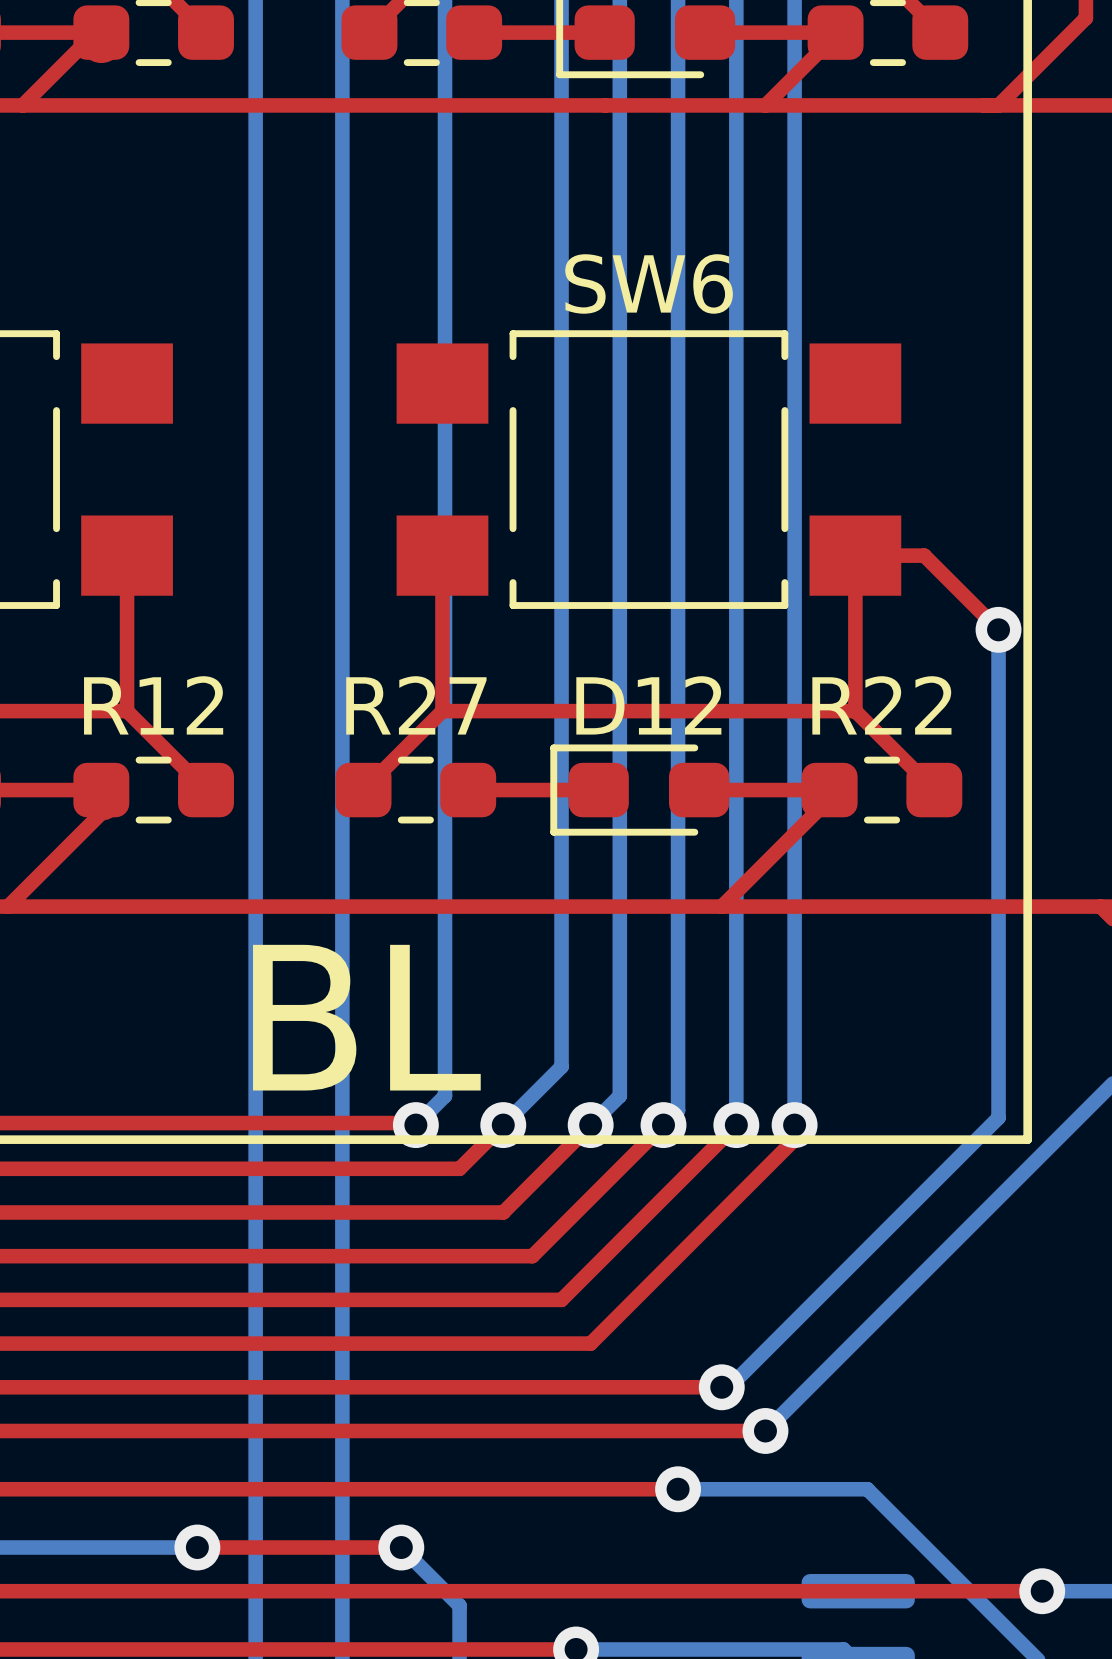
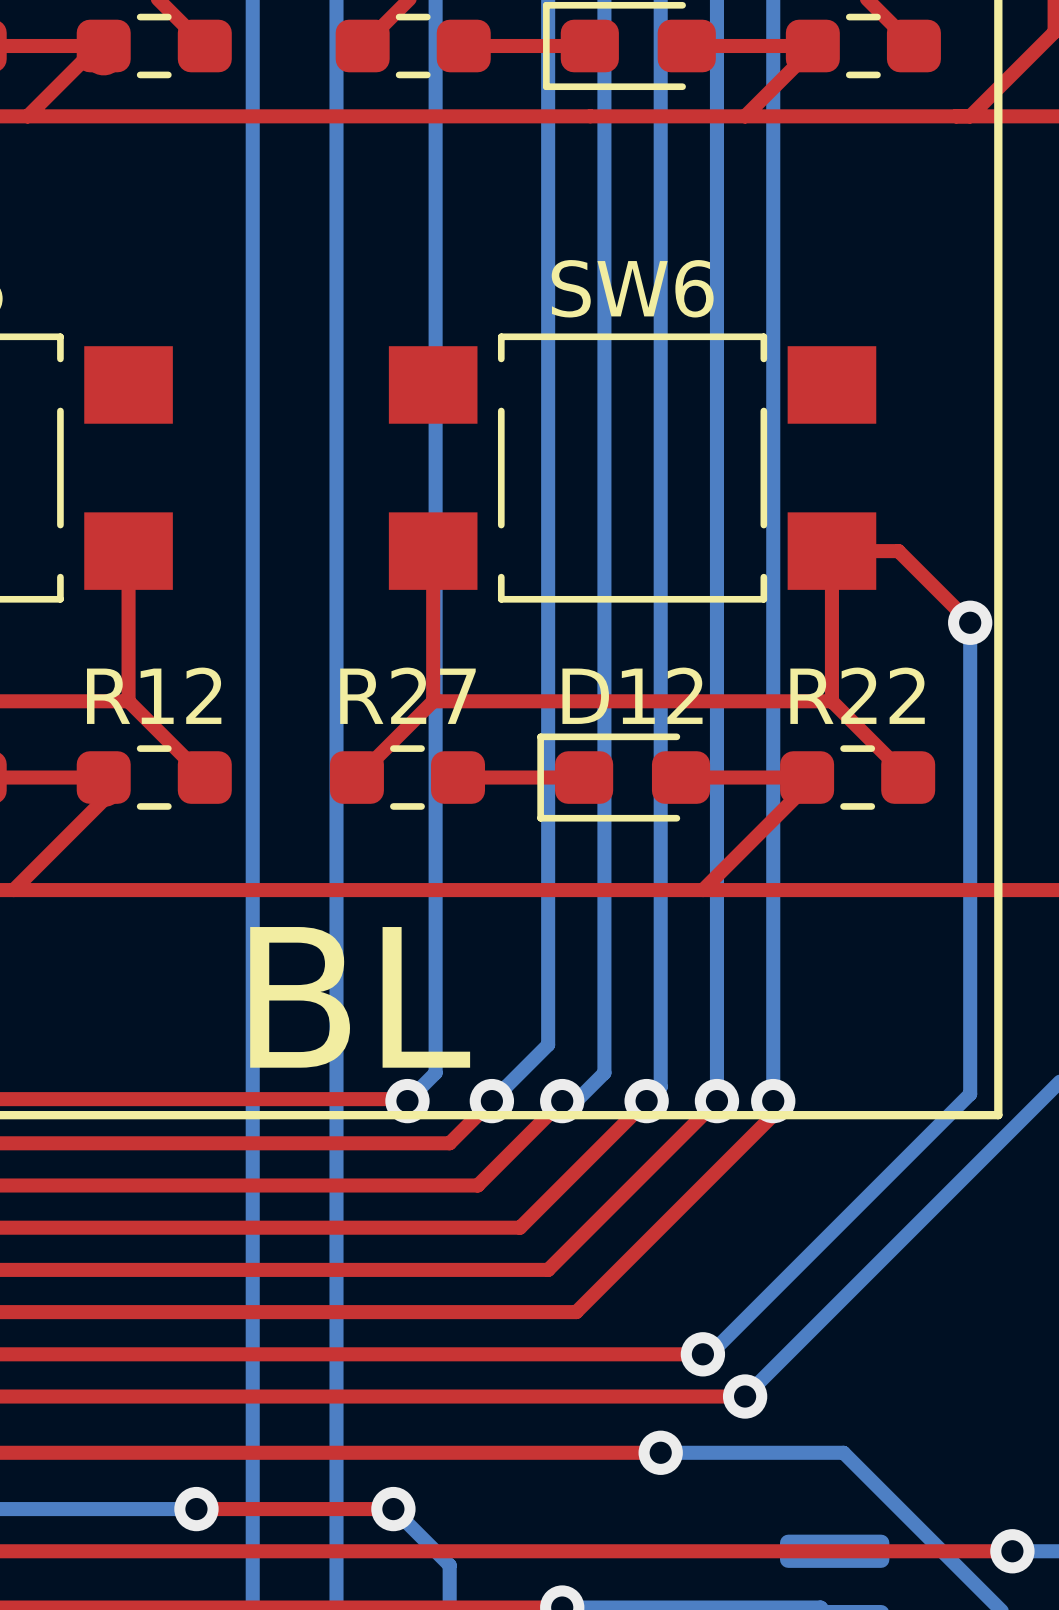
top track: (590, 1125) (503, 1212) (488, 1212) -> (562, 1101) (477, 1185)
via position: (590, 1125) -> (562, 1101)

